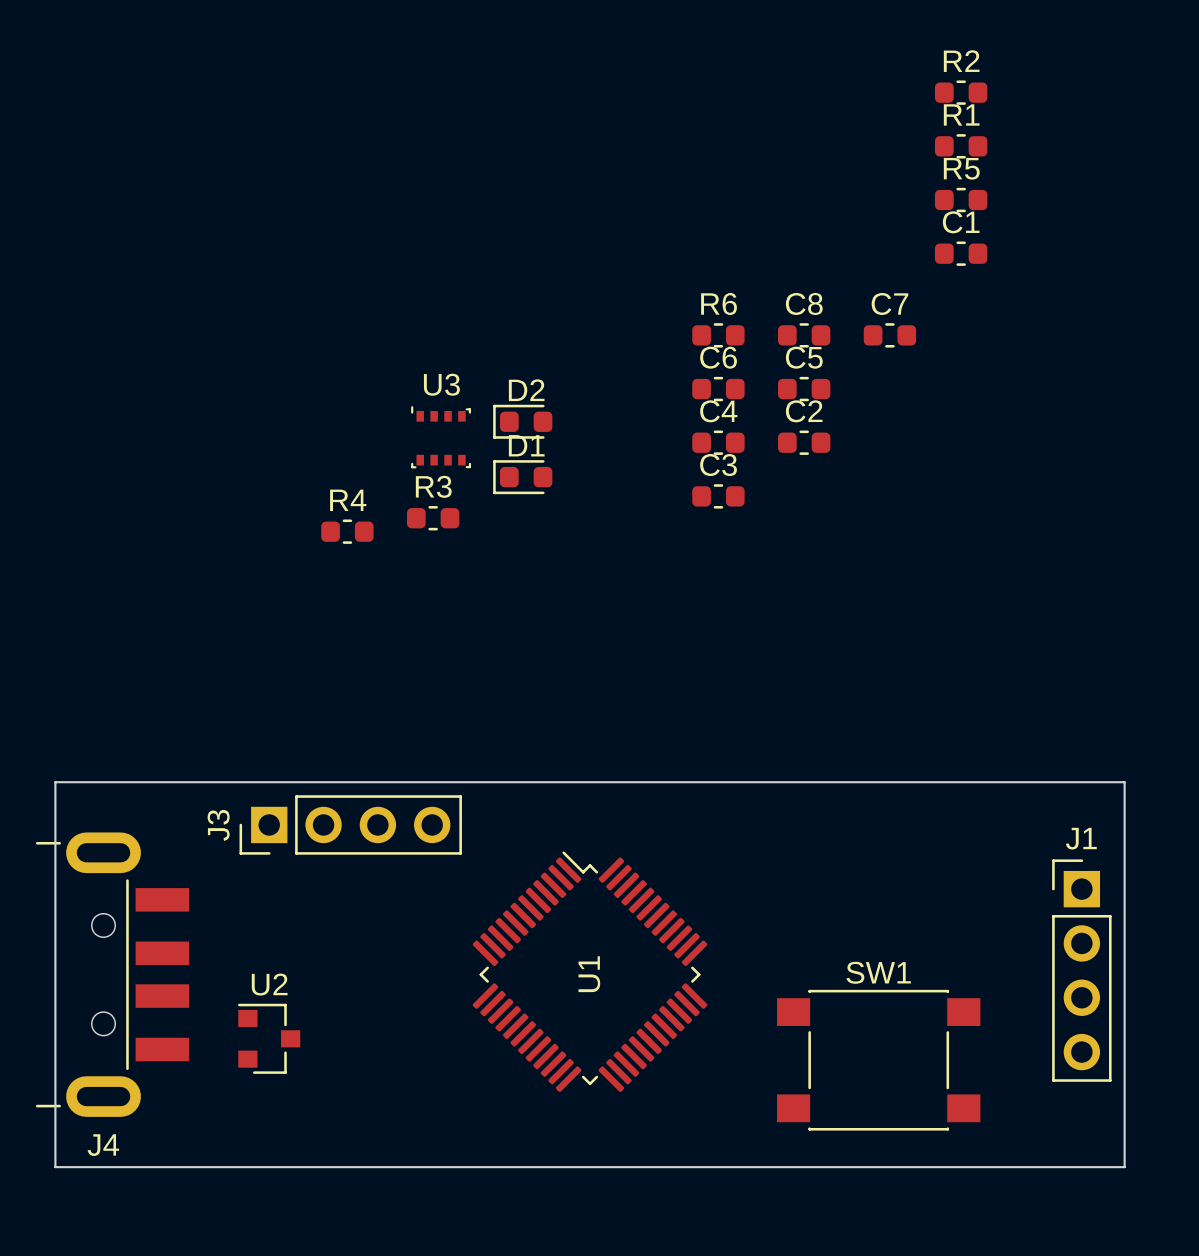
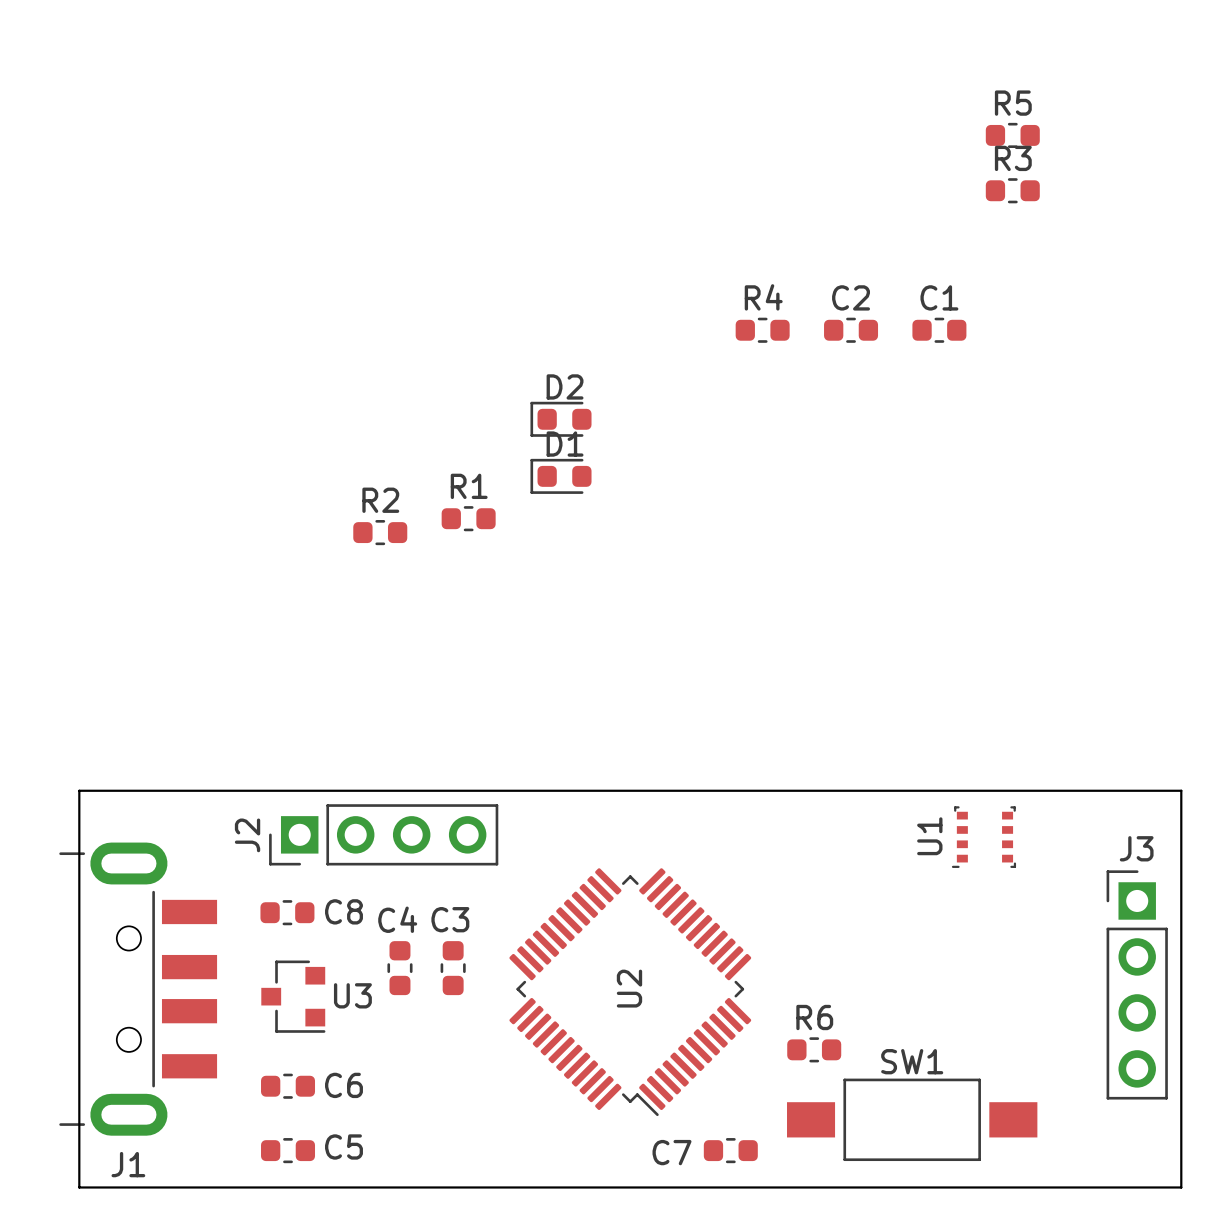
R2: (961, 92) -> none
R1 name: R1 (961, 114) -> R5 (1013, 103)
R5 name: R5 (961, 168) -> R3 (1013, 158)
C1: (961, 253) -> none
R6 name: R6 (719, 303) -> R4 (763, 297)
C8 name: C8 (804, 303) -> C2 (851, 297)
C7 name: C7 (889, 303) -> C1 (939, 297)
C6 name position: C6 (718, 357) -> C6 (343, 1085)
C5 name position: C5 (804, 357) -> C5 (343, 1146)
U3 name position: U3 (441, 384) -> U3 (352, 995)
C6 position: (718, 389) -> (288, 1086)
C5 position: (804, 389) -> (288, 1150)
U3 footprint: [411, 406, 472, 469] -> [261, 960, 326, 1033]
C4 rotation: 0° (718, 442) -> 90° clockwise (399, 968)
C4 position: (718, 442) -> (399, 968)
C2: (804, 442) -> none
R3 name: R3 (433, 486) -> R1 (469, 486)
C3 rotation: 0° (718, 496) -> 90° clockwise (453, 968)
C3 position: (718, 496) -> (453, 968)
R4 name: R4 (348, 500) -> R2 (380, 500)
J3 name: J3 (218, 825) -> J2 (247, 835)
J1 name: J1 (1081, 838) -> J3 (1136, 848)
U1 footprint: [472, 851, 708, 1092] -> [951, 806, 1017, 868]
C8: none -> (287, 912)
U1 name position: U1 (589, 974) -> U1 (929, 836)
U2 name position: U2 (269, 984) -> U2 (629, 988)
SW1 footprint: [777, 989, 981, 1131] -> [787, 1078, 1038, 1162]
U2 footprint: [238, 1003, 301, 1074] -> [509, 868, 752, 1117]
R6: none -> (814, 1049)
C7: none -> (730, 1150)
J4 name: J4 (103, 1145) -> J1 (128, 1164)

